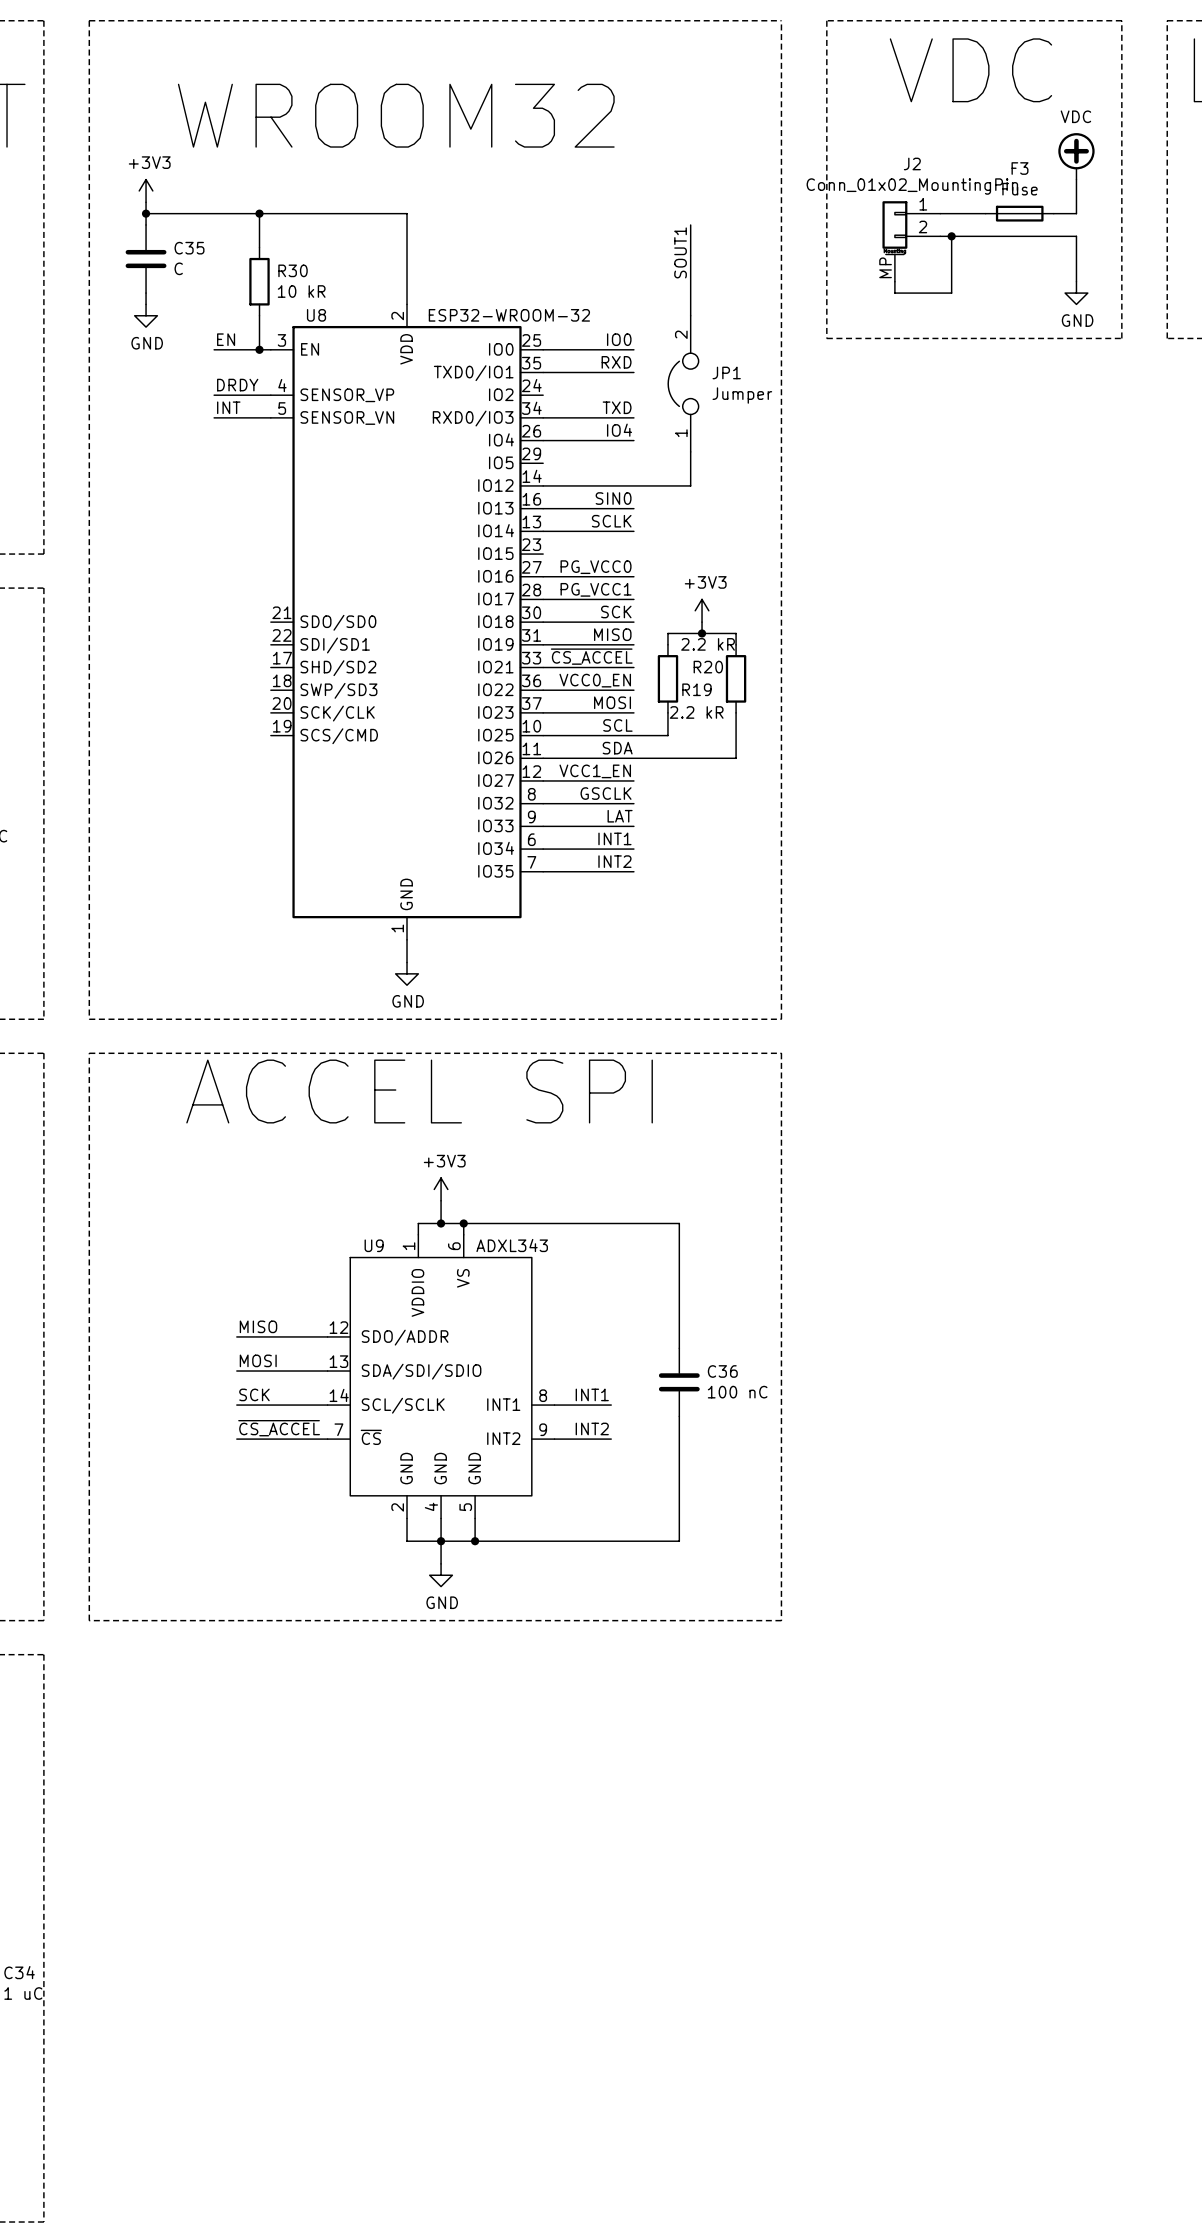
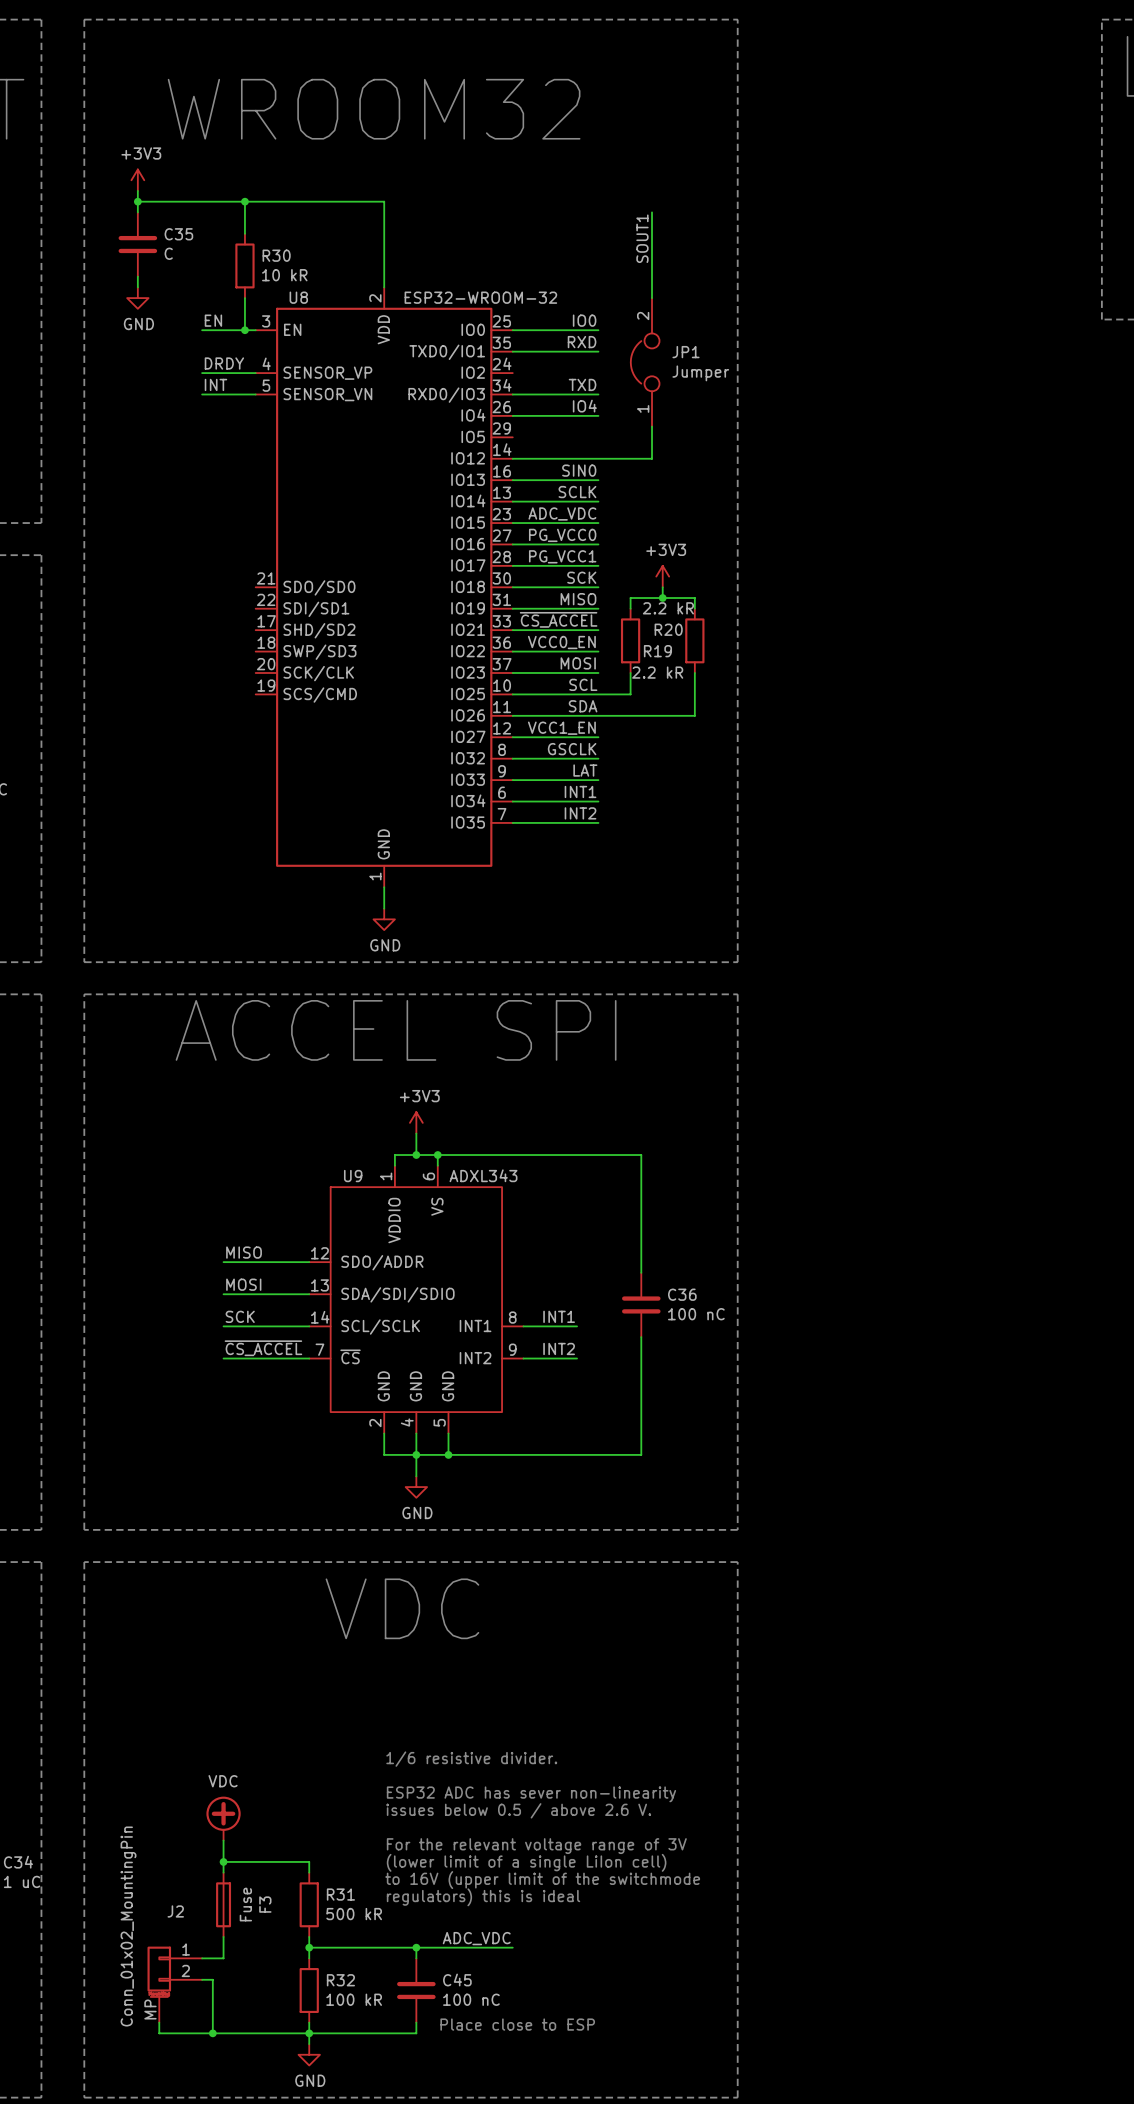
line: (826, 20) (1121, 20) (1121, 338) (826, 338) (826, 20) -> none
text: VDC (970, 70) -> none
power symbol: VDC (1076, 156) -> none
wire: (1076, 179) (1076, 213) (1053, 213) -> none
J2 value rotation: 0° (912, 186) -> 90° counterclockwise (128, 1926)
wire: (940, 213) (985, 213) -> none
F3 rotation: 0° (1019, 213) -> 90° clockwise (223, 1904)
F3 position: (1019, 213) -> (223, 1904)
wire: (940, 236) (1076, 236) (1076, 281) -> none
wire: (951, 236) (951, 293) (894, 293) (894, 281) -> none
junction: (951, 236) -> none
J2 position: (911, 241) -> (174, 1984)
power symbol: GND (1076, 293) -> none
label: none -> ADC_VDC (562, 513)
wire: none -> (512, 523) (598, 523)
line: none -> (84, 1562) (84, 2097) (737, 2097) (737, 1562) (84, 1562)
text: none -> VDC (402, 1608)
text: none -> 1/6 resistive divider. (471, 1759)
text: none -> ESP32 ADC has sever non-linearity (531, 1794)
text: none -> issues below 0.5 / above 2.6 V. (518, 1810)
power symbol: none -> VDC (223, 1818)
wire: none -> (223, 1840) (223, 1872)
text: none -> For the relevant voltage range of 3V (536, 1846)
wire: none -> (223, 1861) (309, 1861) (309, 1872)
junction: none -> (223, 1861)
text: none -> (lower limit of a single LiIon cell) (526, 1862)
text: none -> to 16V (upper limit of the switchmode (542, 1880)
text: none -> regulators) this is ideal (483, 1897)
R31: none -> 500 kR (309, 1904)
wire: none -> (223, 1936) (223, 1958) (202, 1958)
wire: none -> (309, 1936) (309, 1958)
label: none -> ADC_VDC (476, 1938)
wire: none -> (309, 1947) (512, 1947)
junction: none -> (309, 1947)
wire: none -> (416, 1947) (416, 1958)
junction: none -> (416, 1947)
wire: none -> (202, 1979) (212, 1979) (212, 2033)
R32: none -> 100 kR (309, 1990)
C45: none -> 100 nC (416, 1990)
wire: none -> (159, 2022) (159, 2033) (416, 2033) (416, 2022)
wire: none -> (309, 2022) (309, 2044)
text: none -> Place close to ESP (517, 2024)
junction: none -> (212, 2033)
junction: none -> (309, 2033)
power symbol: none -> GND (309, 2054)

